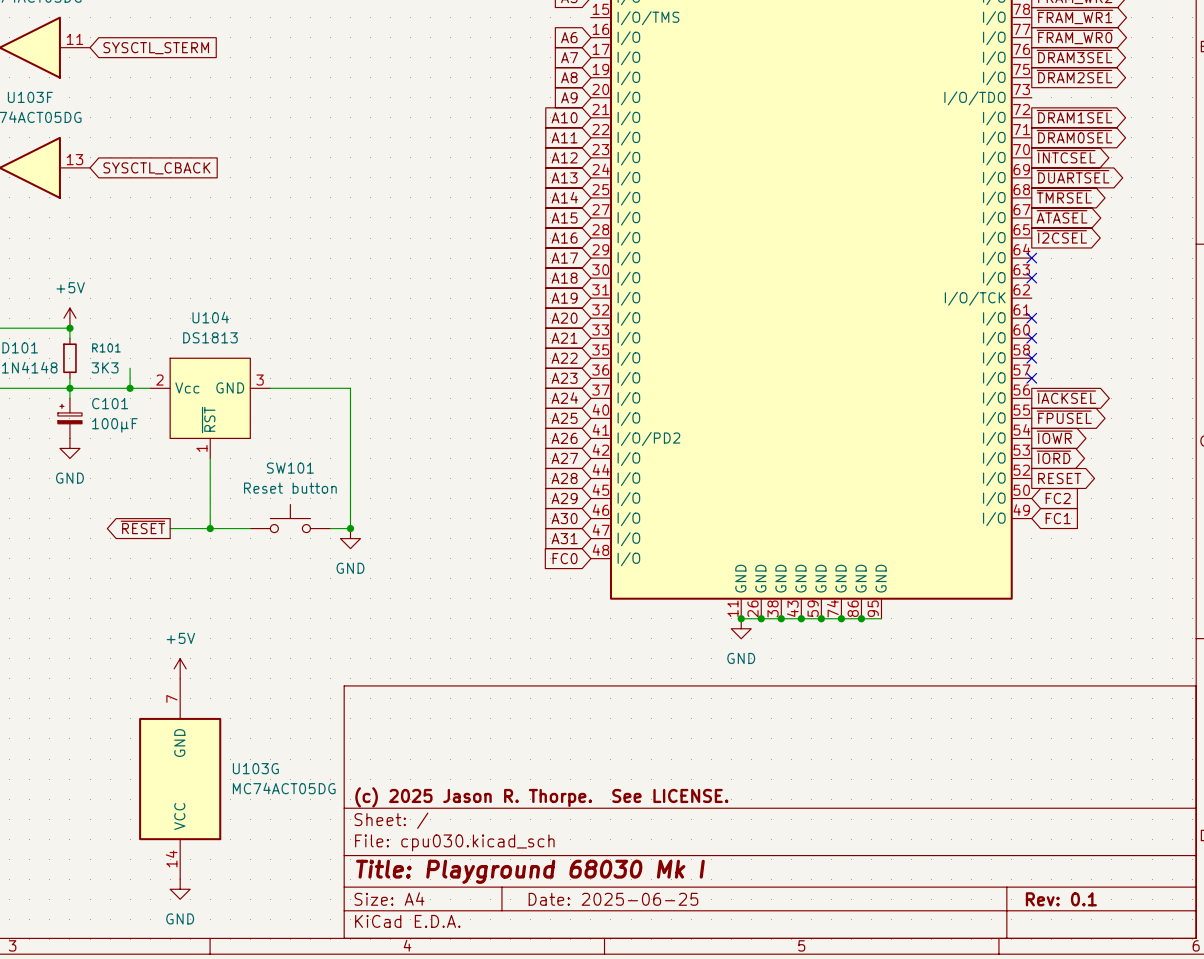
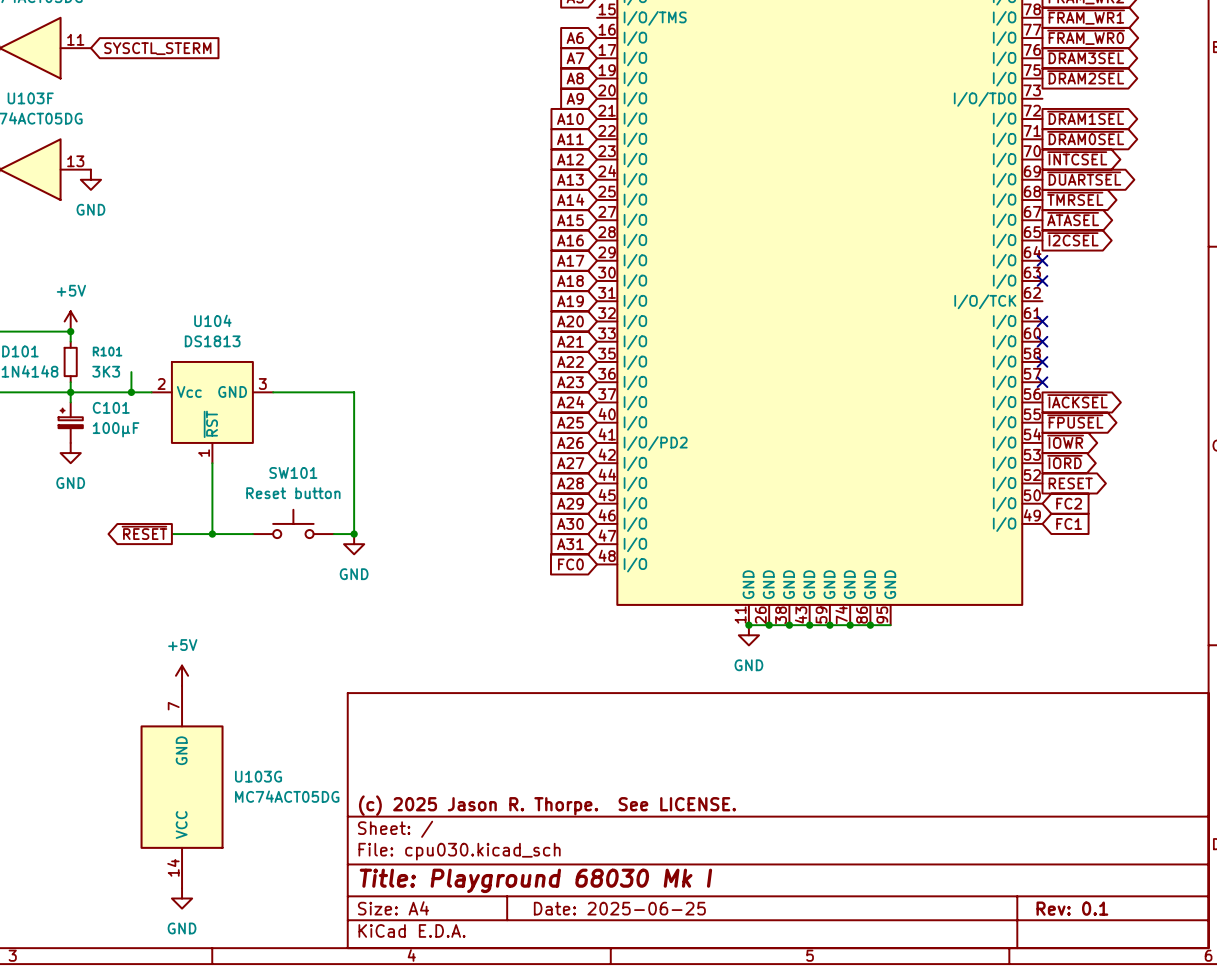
global label: SYSCTL_CBACK (156, 168) -> none
power symbol: none -> GND (90, 179)

